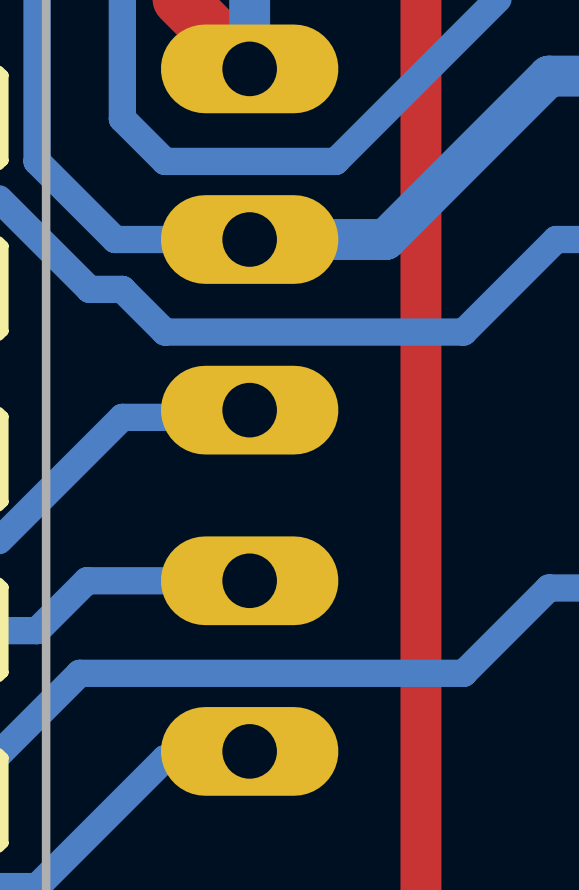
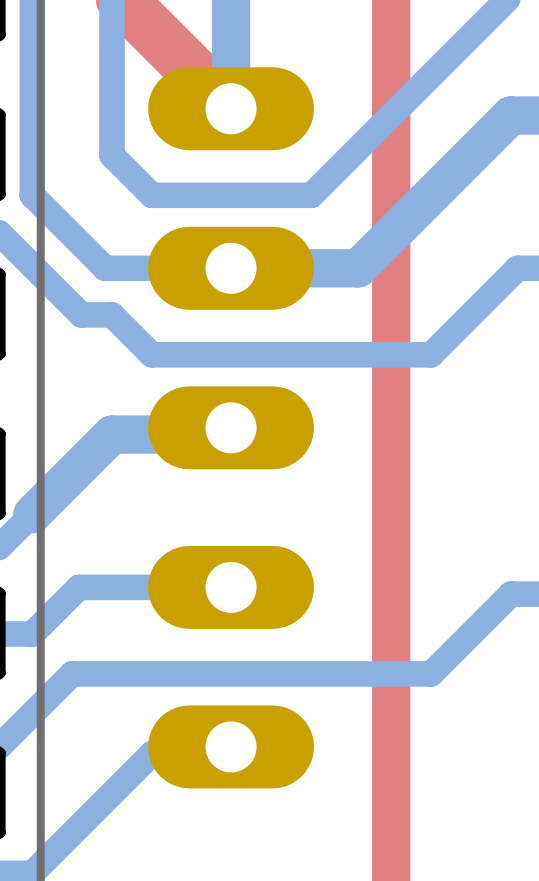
bottom track width: thin (249, 410) (242, 417) (122, 417) (37, 502) -> thick (231, 427) (224, 434) (112, 434) (32, 514)

